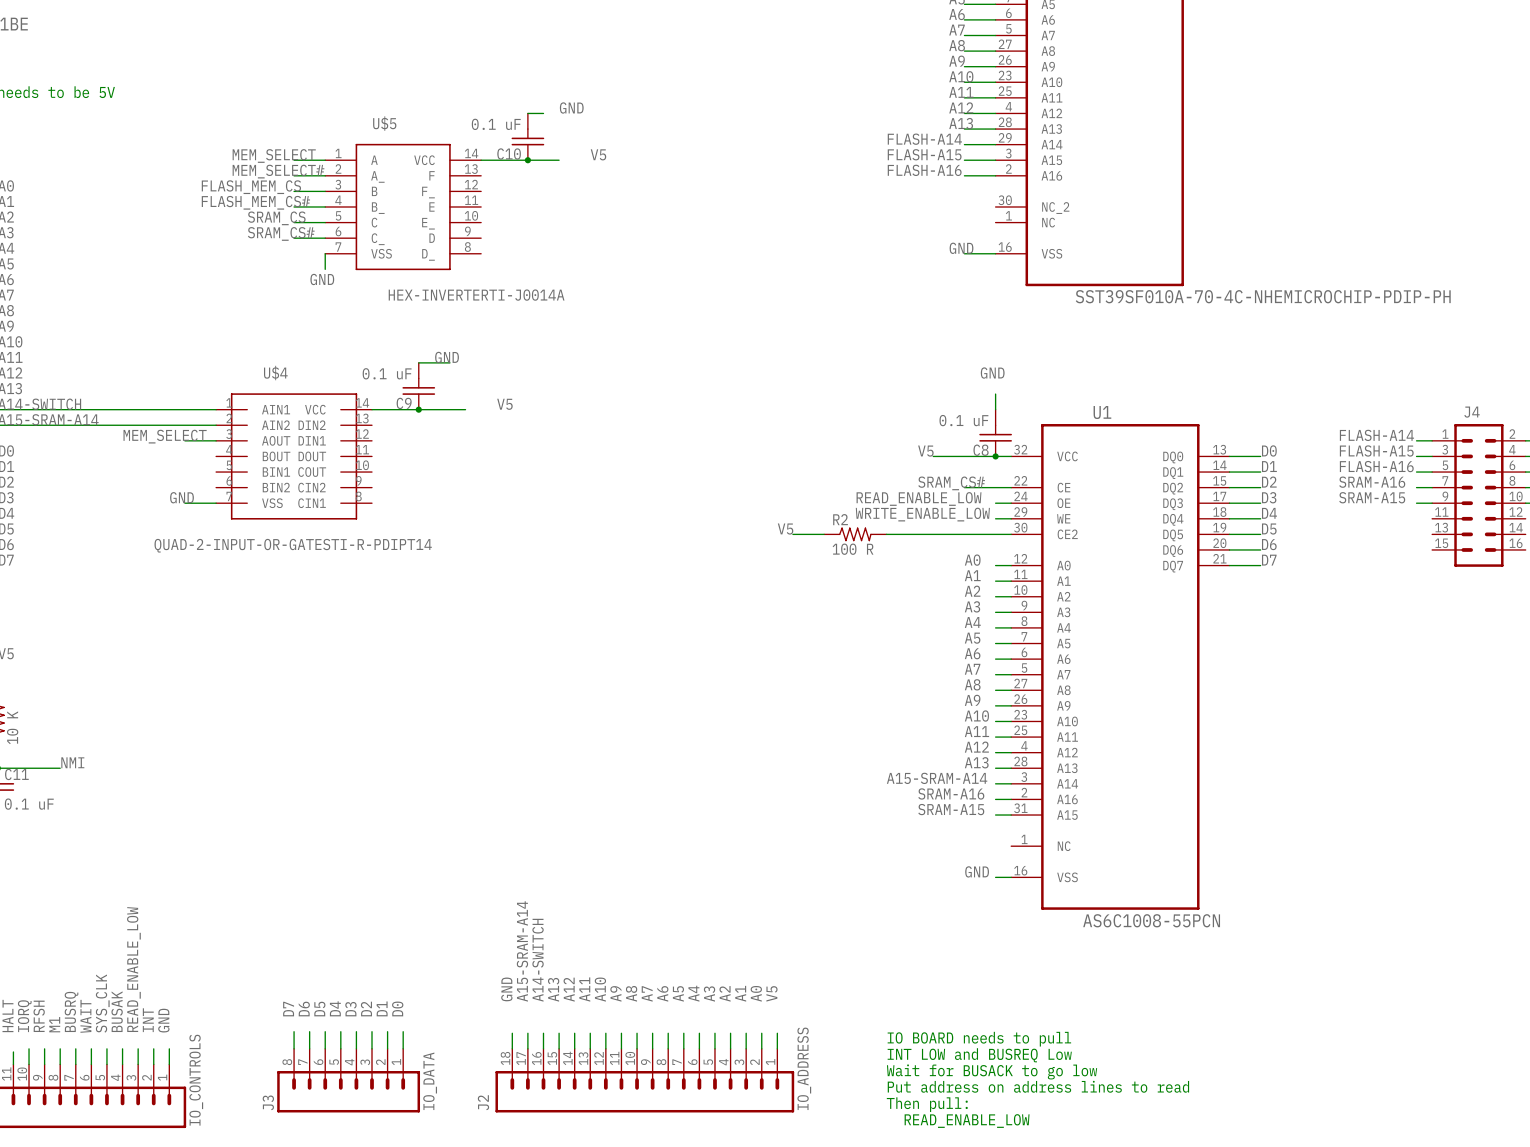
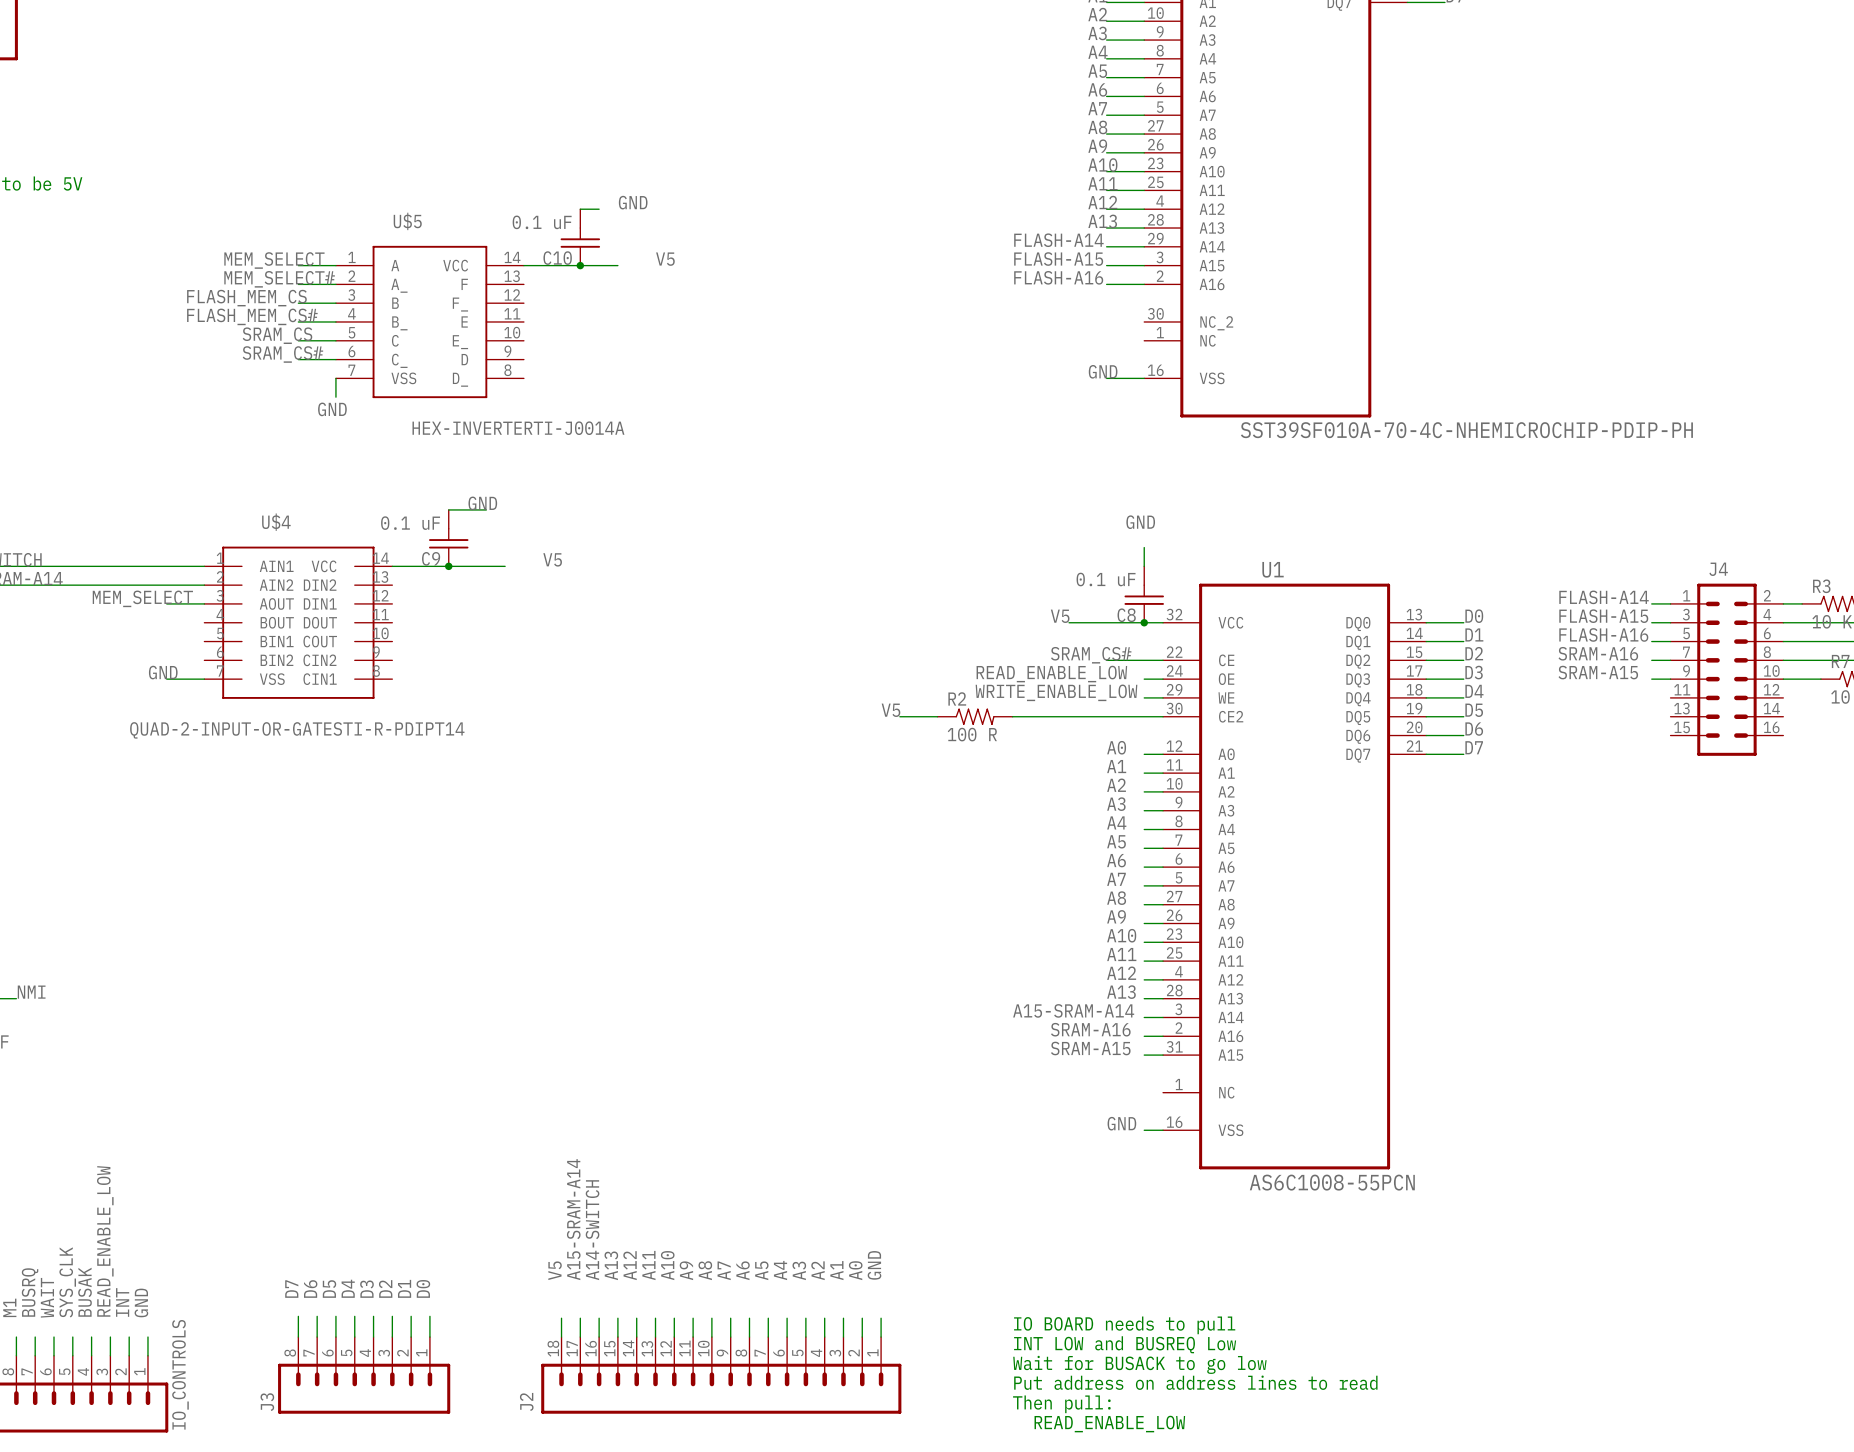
label: GND (506, 989) -> V5 (555, 1270)
label: V5 (771, 993) -> GND (874, 1265)
J2 value: IO_ADDRESS (804, 1068) -> none
J3 value: IO_DATA (430, 1081) -> none

